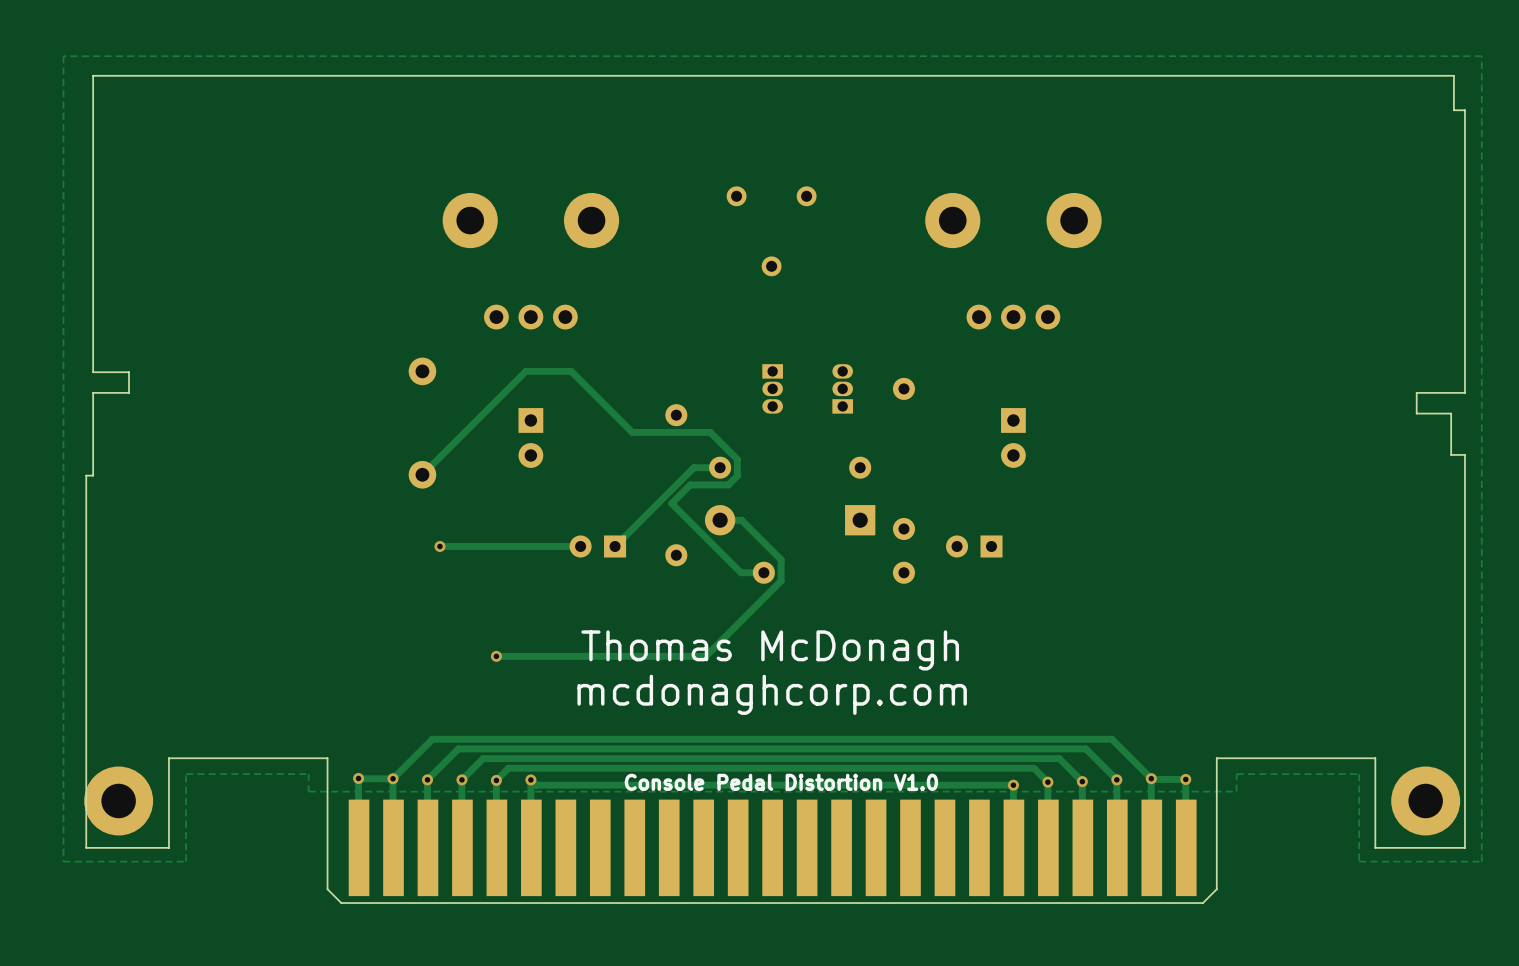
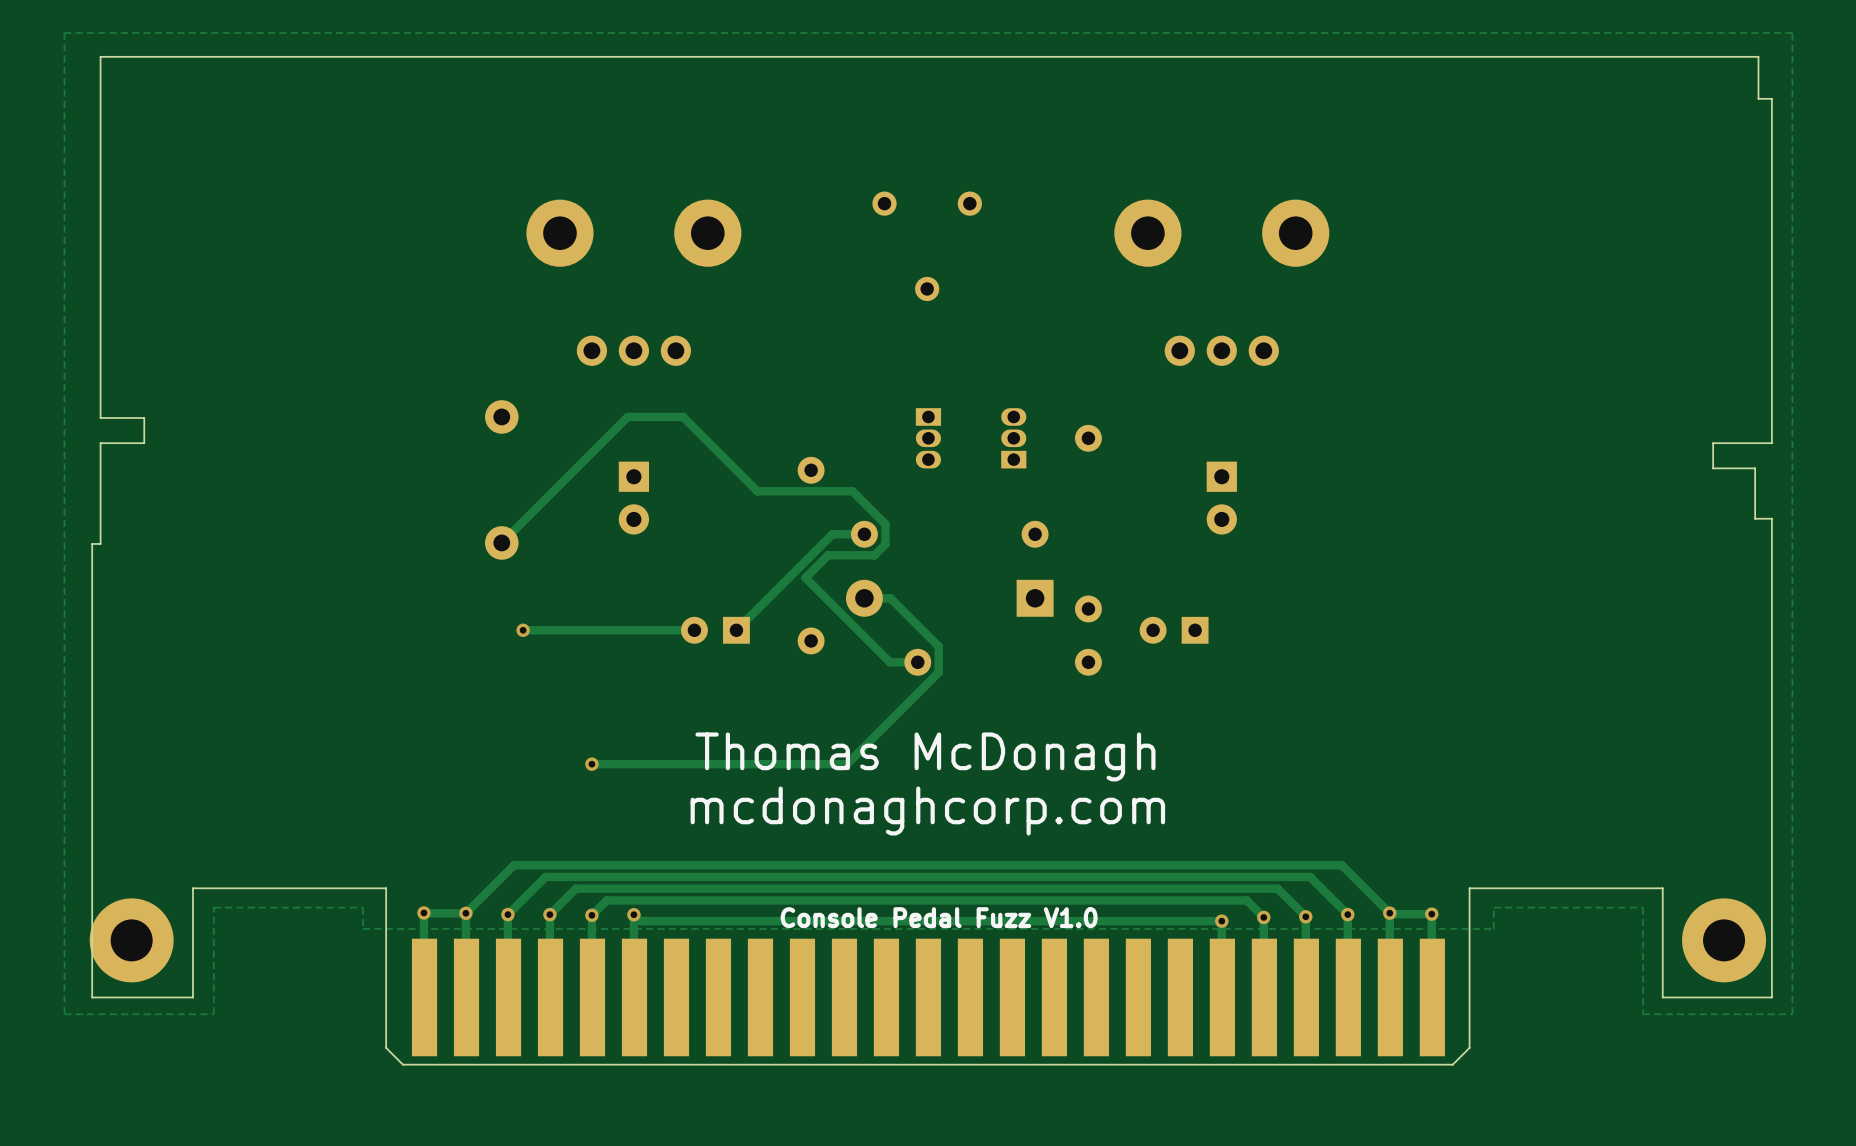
text: Console Pedal Distortion V1.0 (781, 782) -> Console Pedal Fuzz V1.0 (939, 917)

